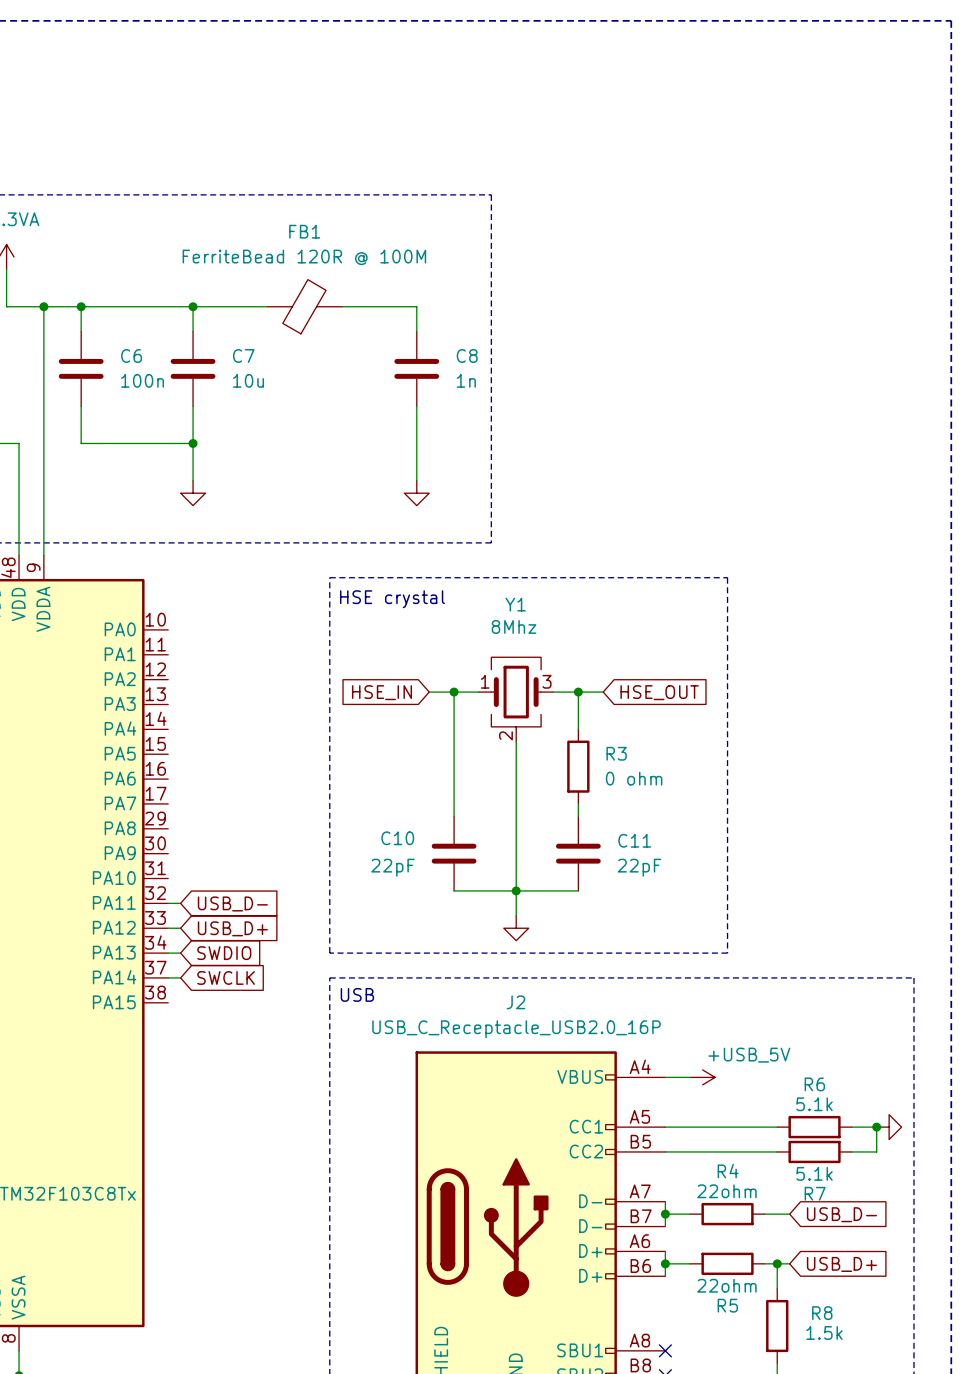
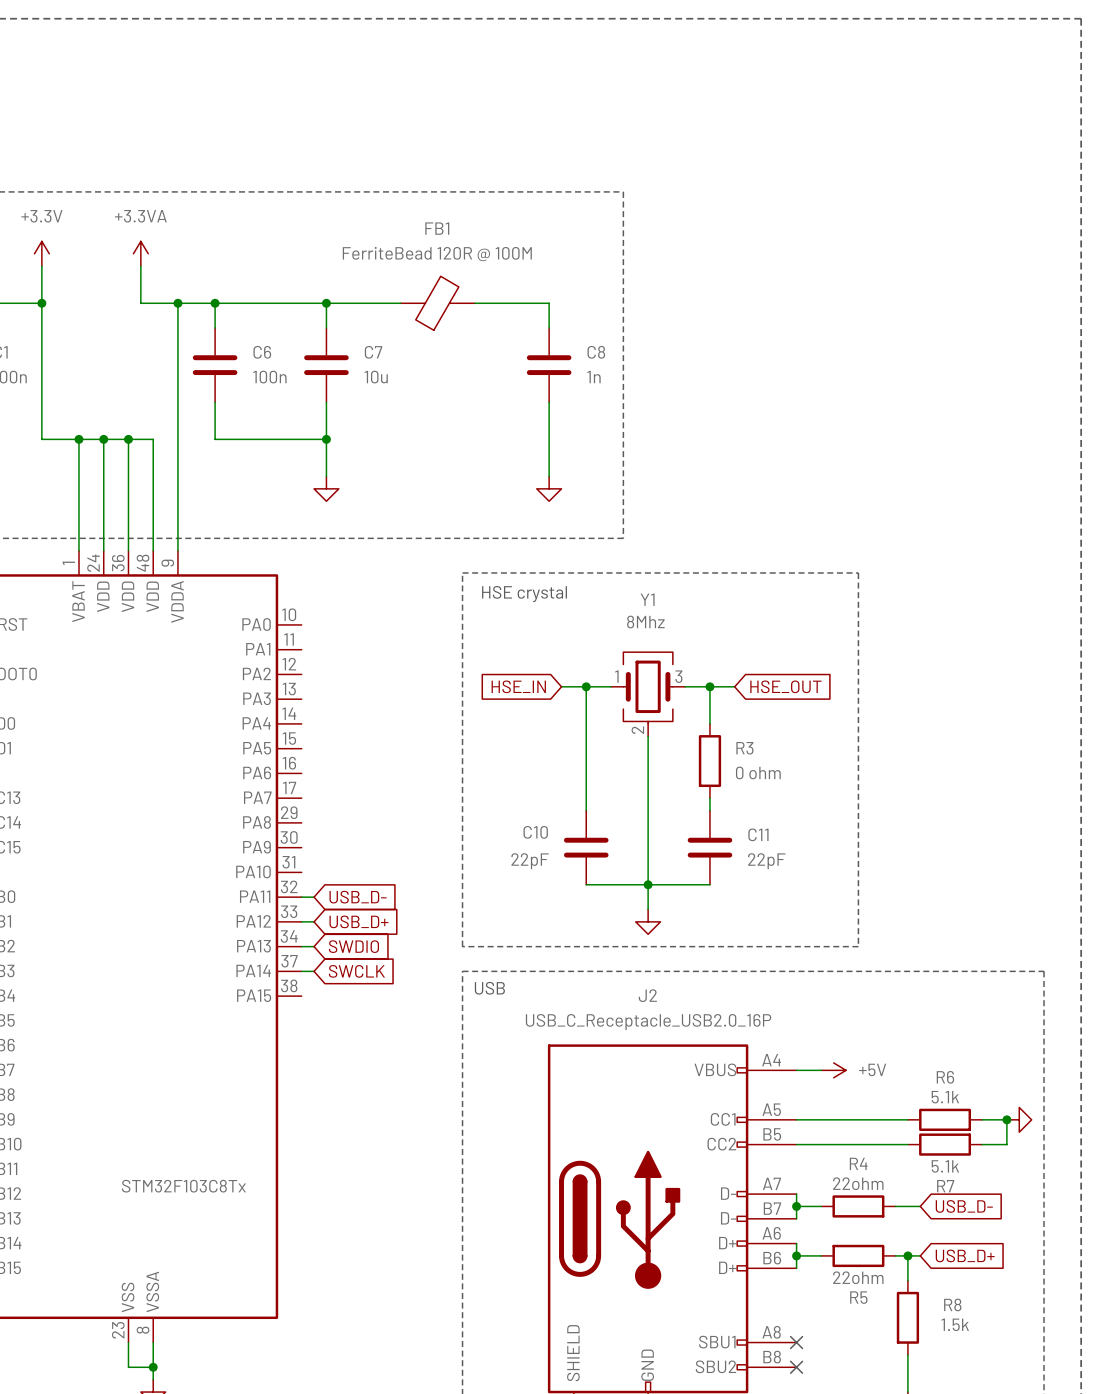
power symbol: +USB_5V (702, 1077) -> +5V (833, 1070)

